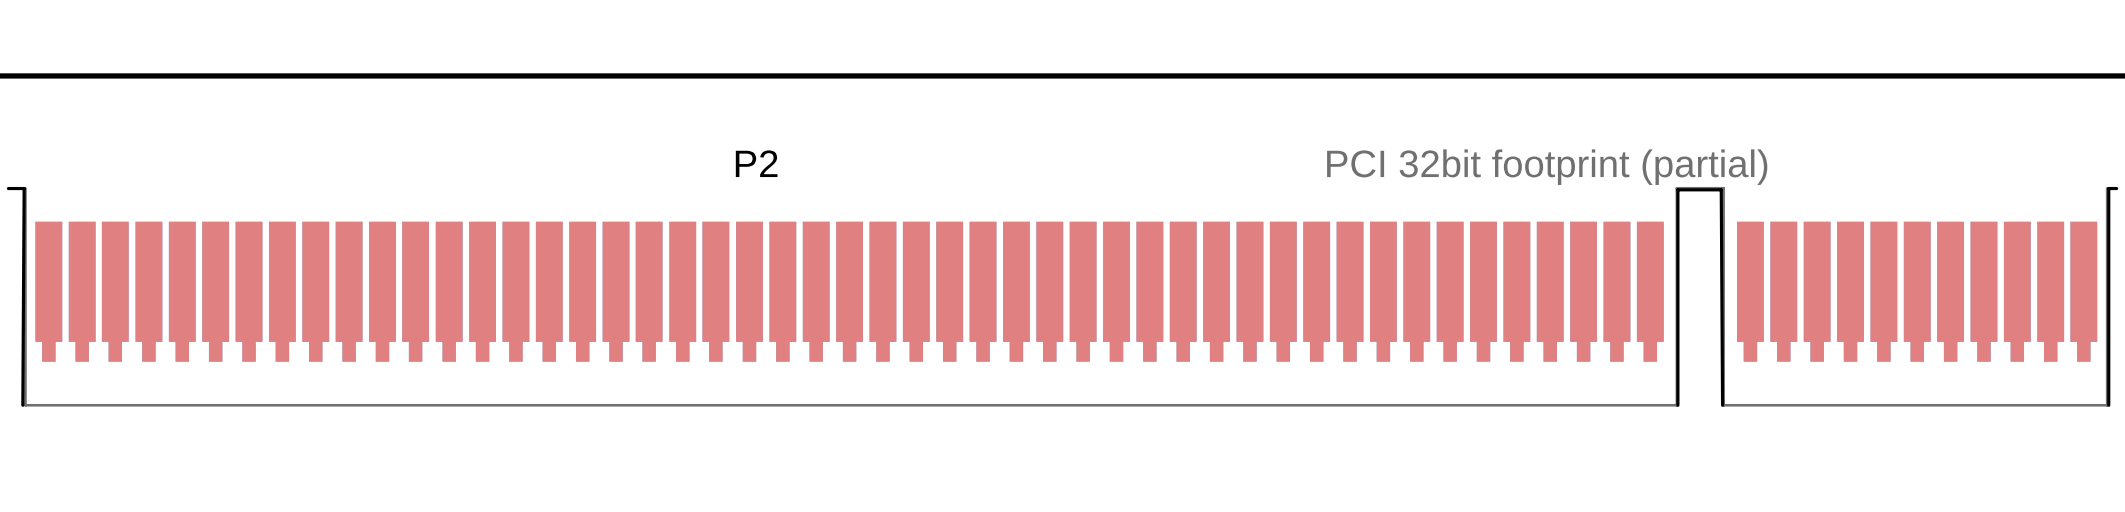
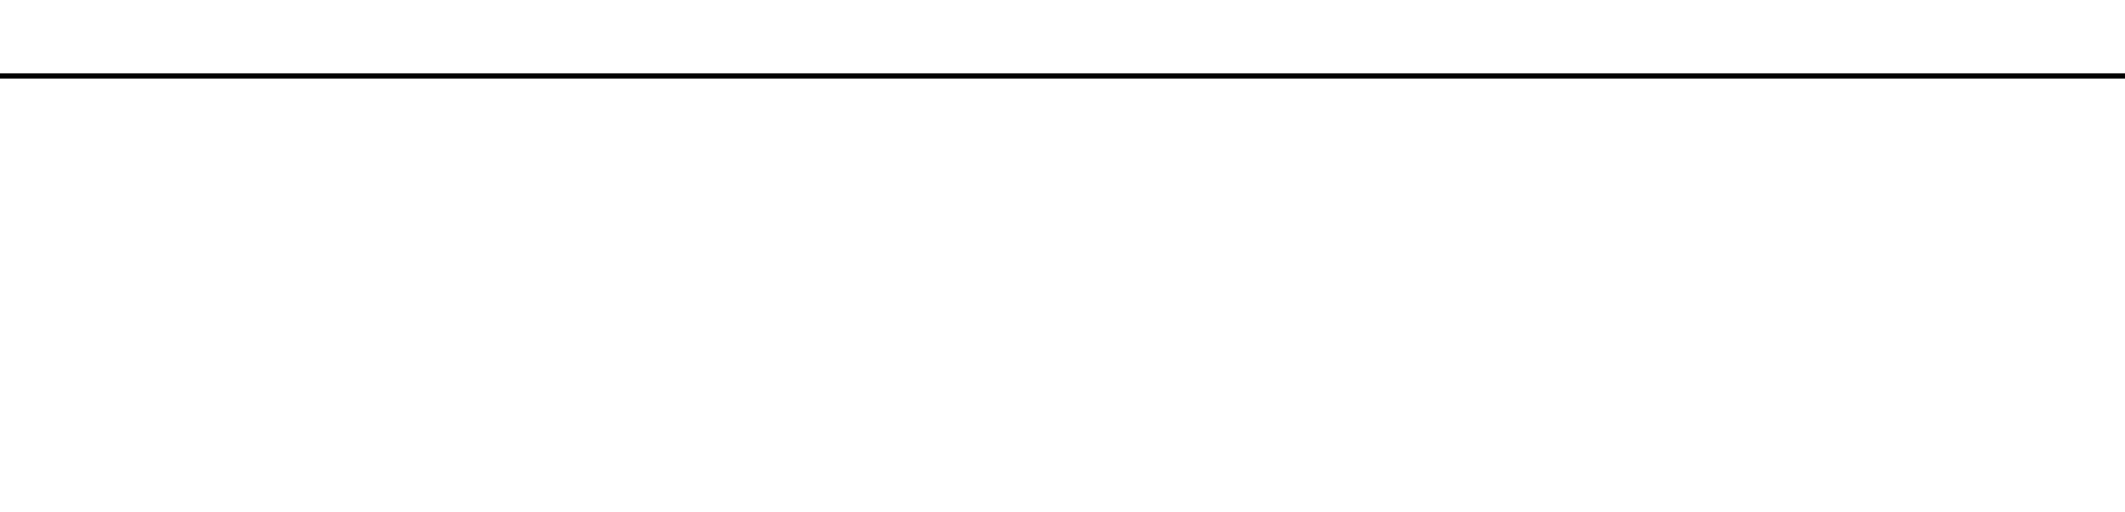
P2: PCI 32bit footprint (partial) (1062, 296) -> none

